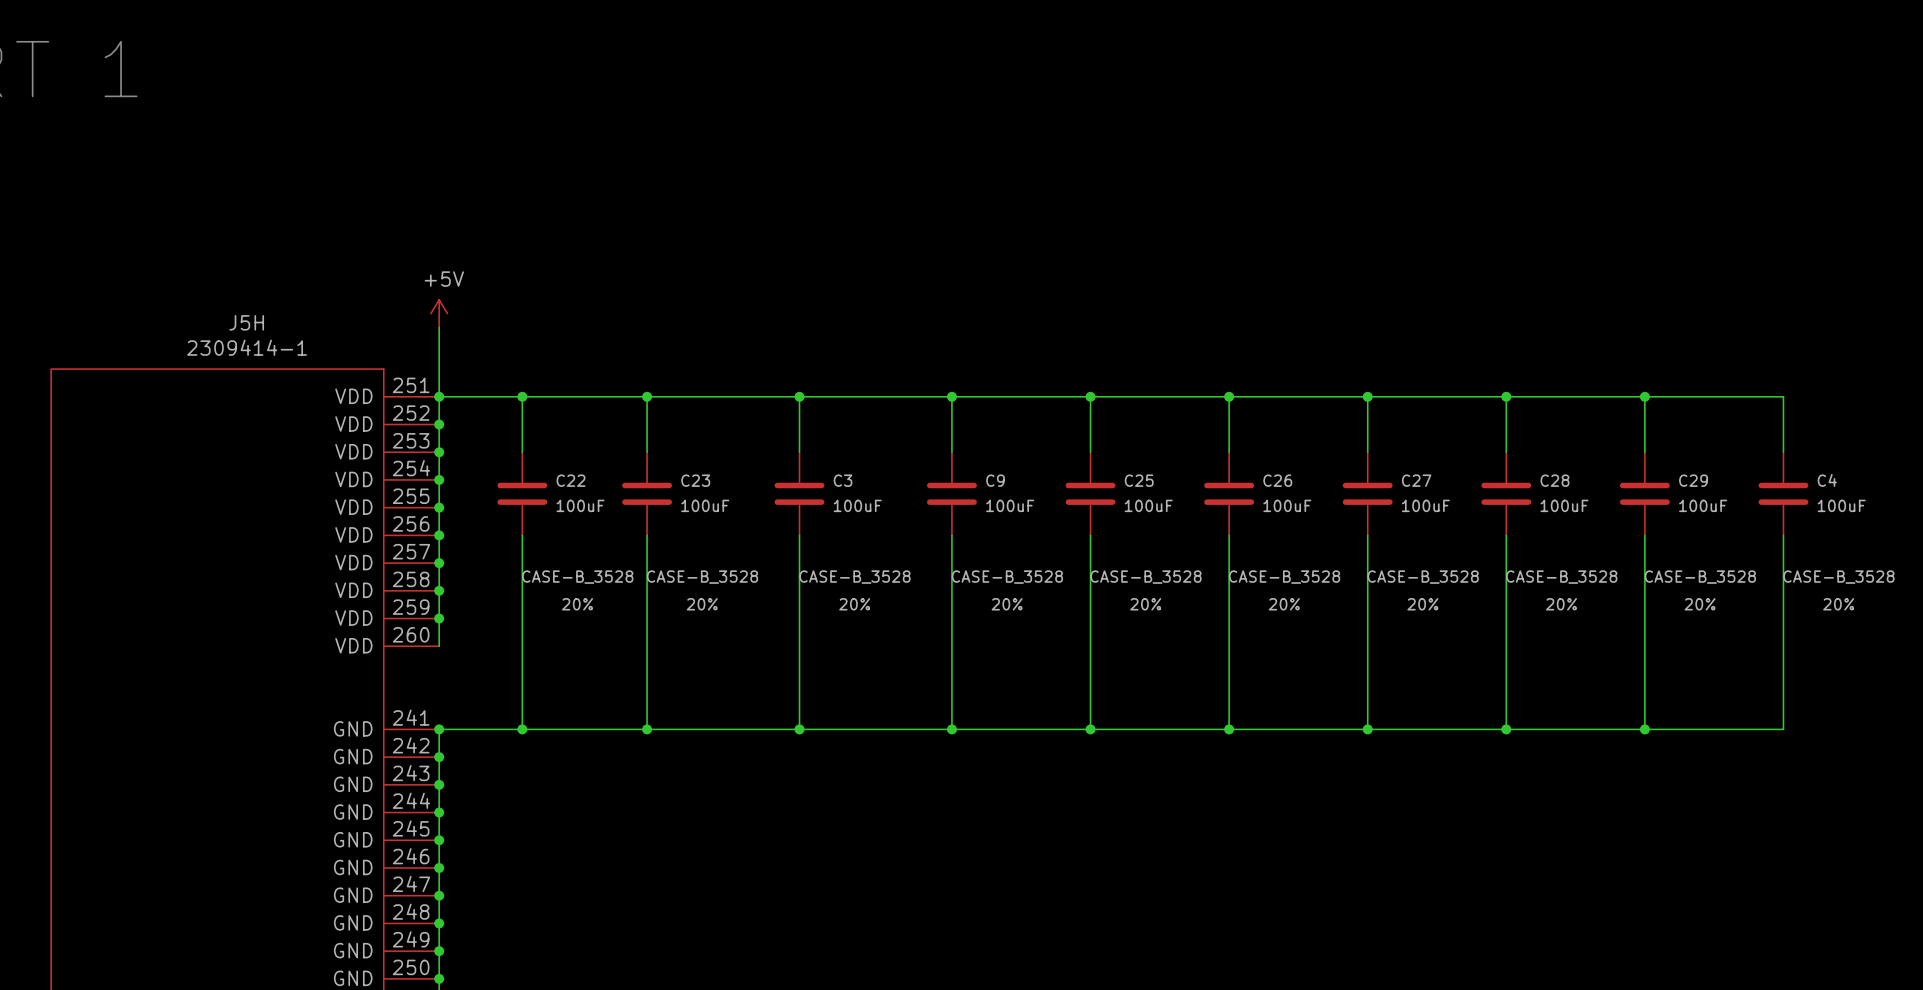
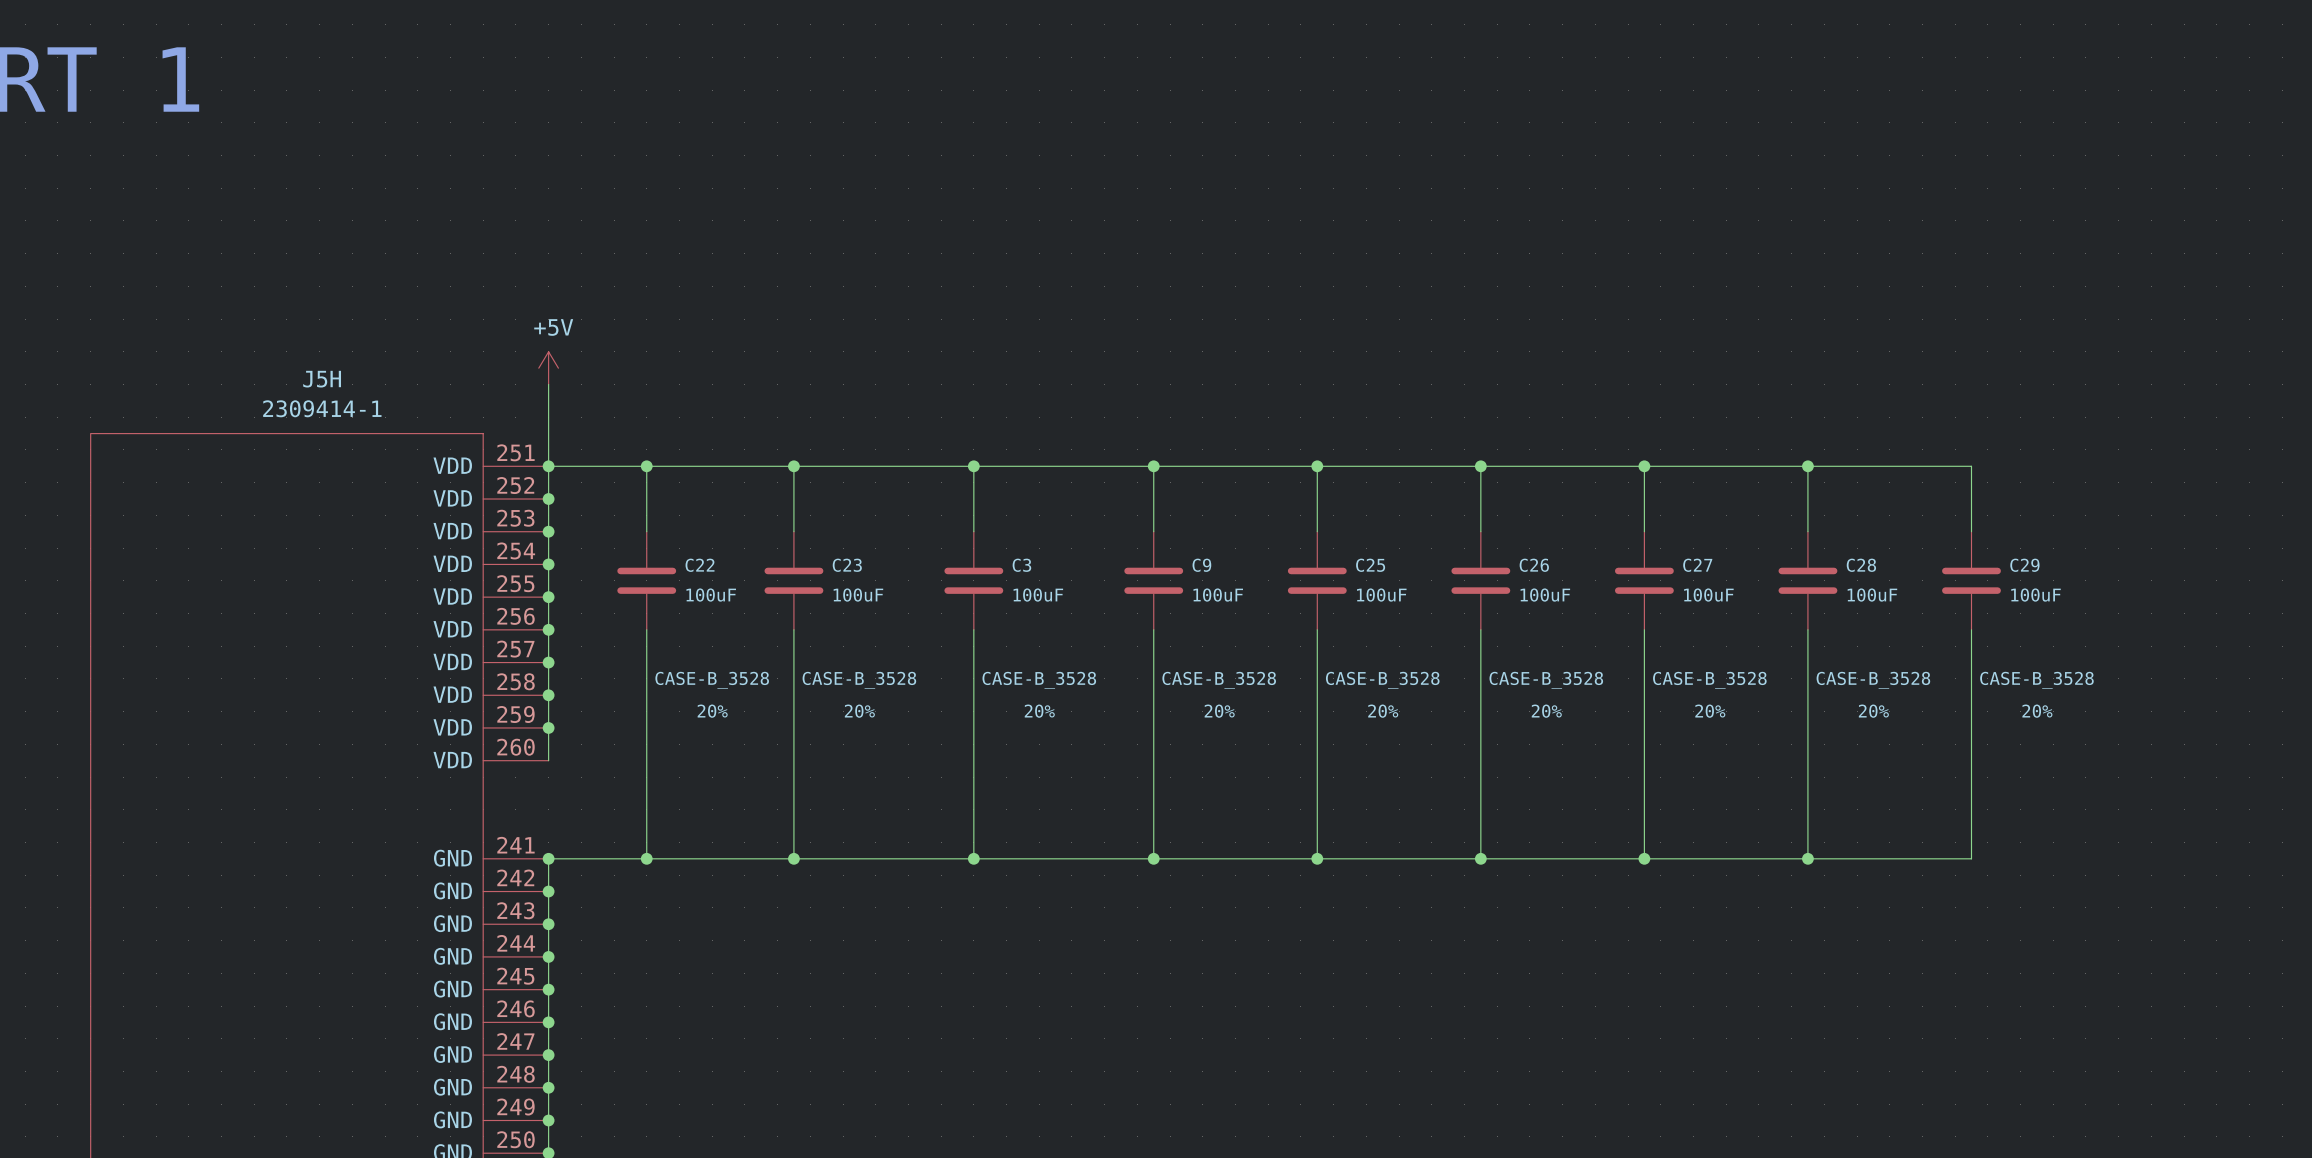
wire: (1644, 396) (1783, 396) (1783, 452) -> none
junction: (1644, 396) -> none
C4: 100uF (1783, 493) -> none
wire: (1783, 535) (1783, 729) (1644, 729) -> none
junction: (1644, 729) -> none

